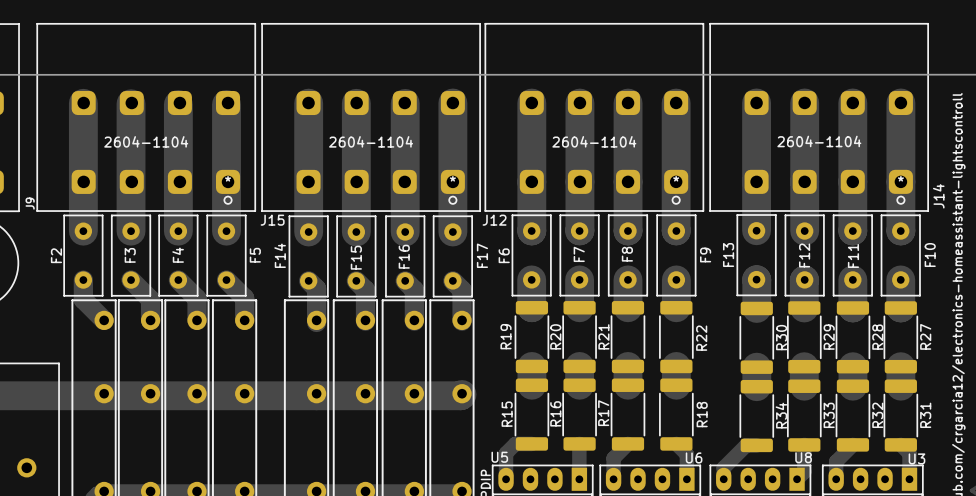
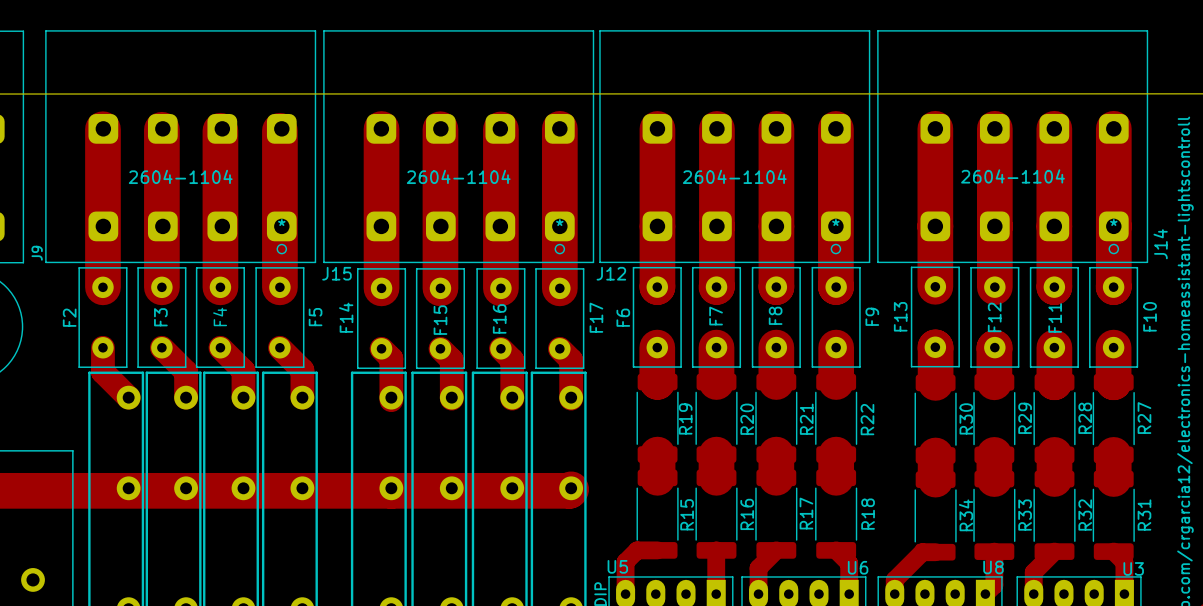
R19 name position: R19 (506, 336) -> R19 (685, 418)
R20 name position: R20 (555, 336) -> R20 (747, 419)
R21 name position: R21 (603, 336) -> R21 (806, 419)
R16 name position: R16 (555, 413) -> R16 (747, 514)
R17 name position: R17 (603, 413) -> R17 (806, 513)
R15 name position: R15 (507, 414) -> R15 (687, 514)

